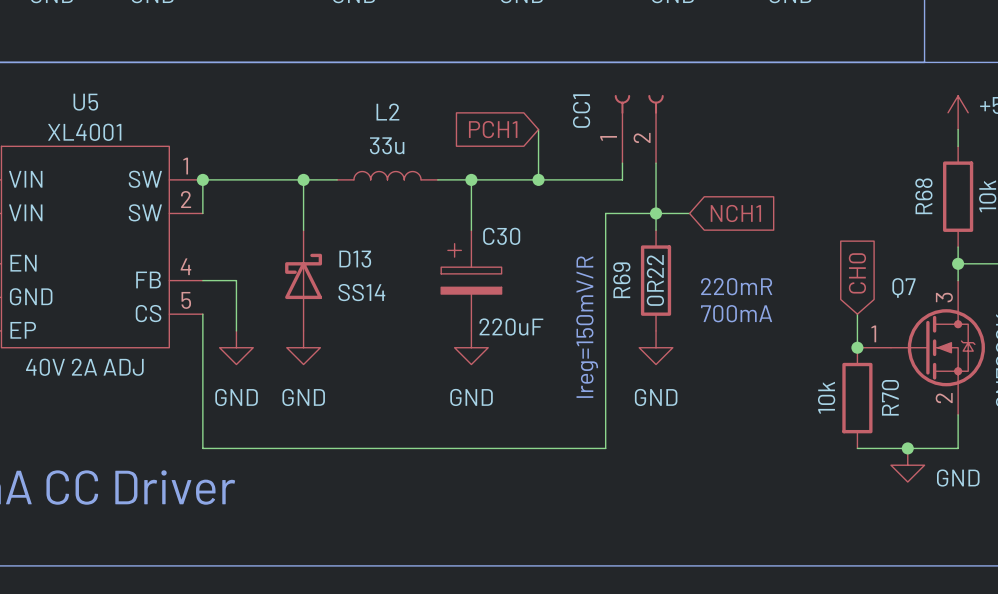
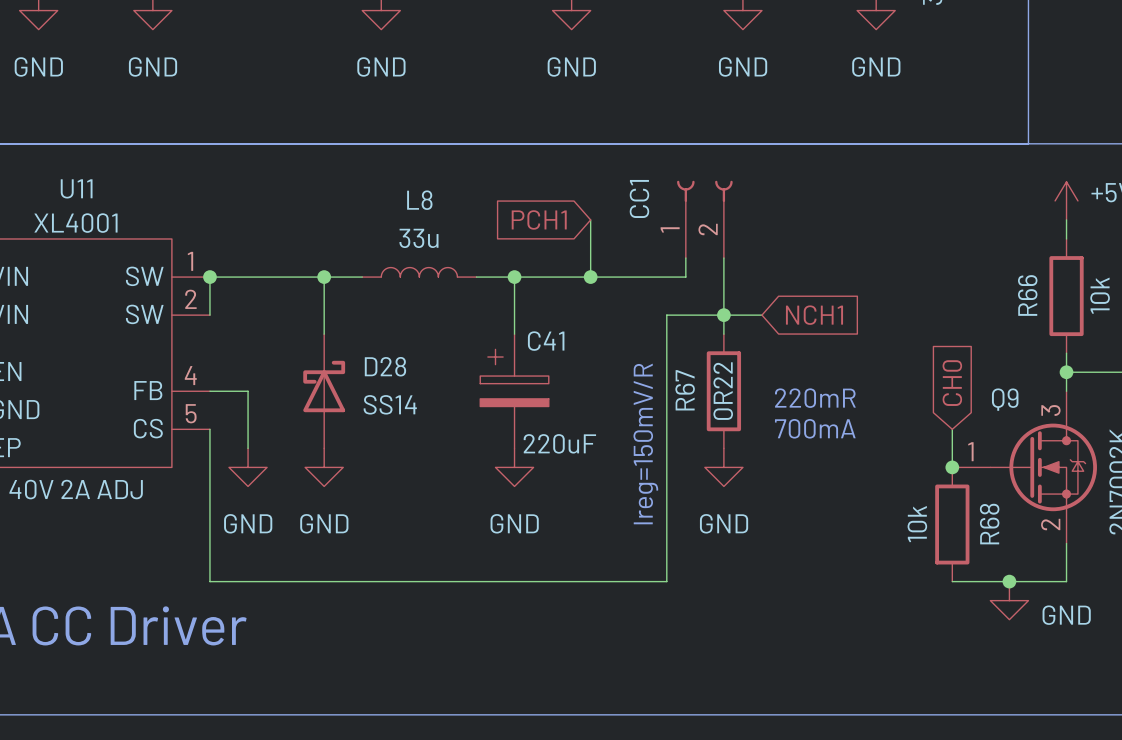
U5 name: U5 (85, 102) -> U11 (76, 188)
L2 name: L2 (387, 112) -> L8 (419, 200)
R68 name: R68 (923, 196) -> R66 (1027, 295)
C30 name: C30 (501, 236) -> C41 (546, 341)
D13 name: D13 (355, 259) -> D28 (385, 366)
R69 name: R69 (621, 280) -> R67 (685, 390)
Q7 name: Q7 (903, 287) -> Q9 (1005, 399)
R70 name: R70 (890, 397) -> R68 (989, 524)

